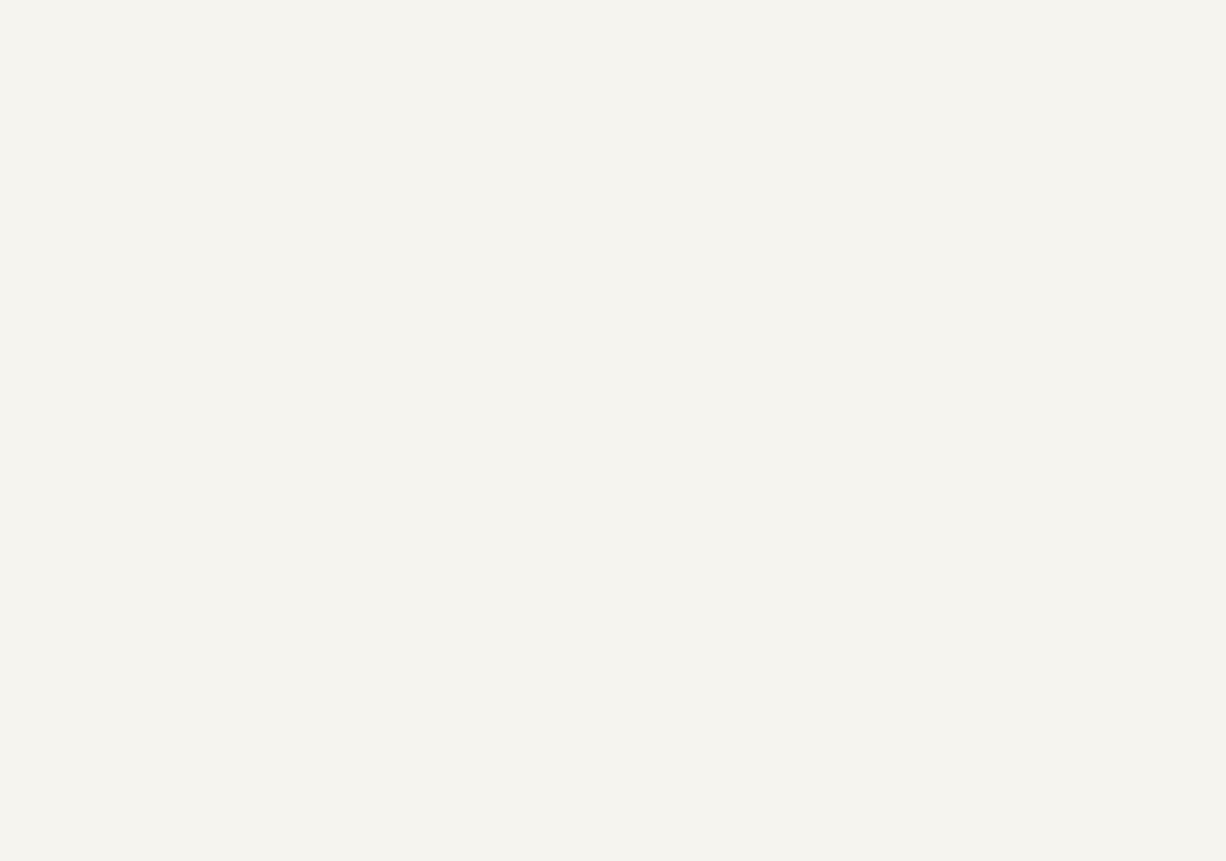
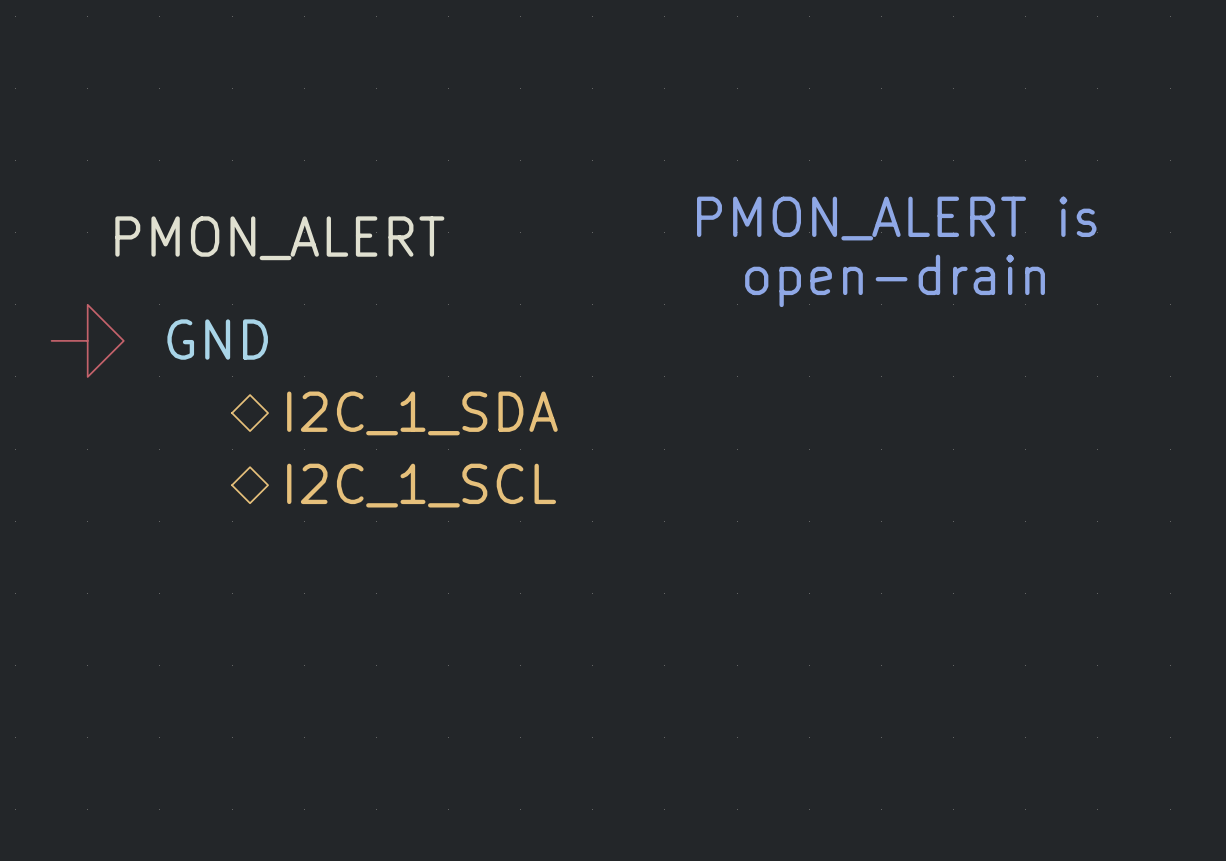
text: none -> PMON_ALERT is (896, 218)
label: none -> PMON_ALERT (279, 238)
text: none -> open-drain (895, 280)
power symbol: none -> GND (87, 340)
hierarchical label: none -> I2C_1_SDA (422, 413)
hierarchical label: none -> I2C_1_SCL (421, 485)

